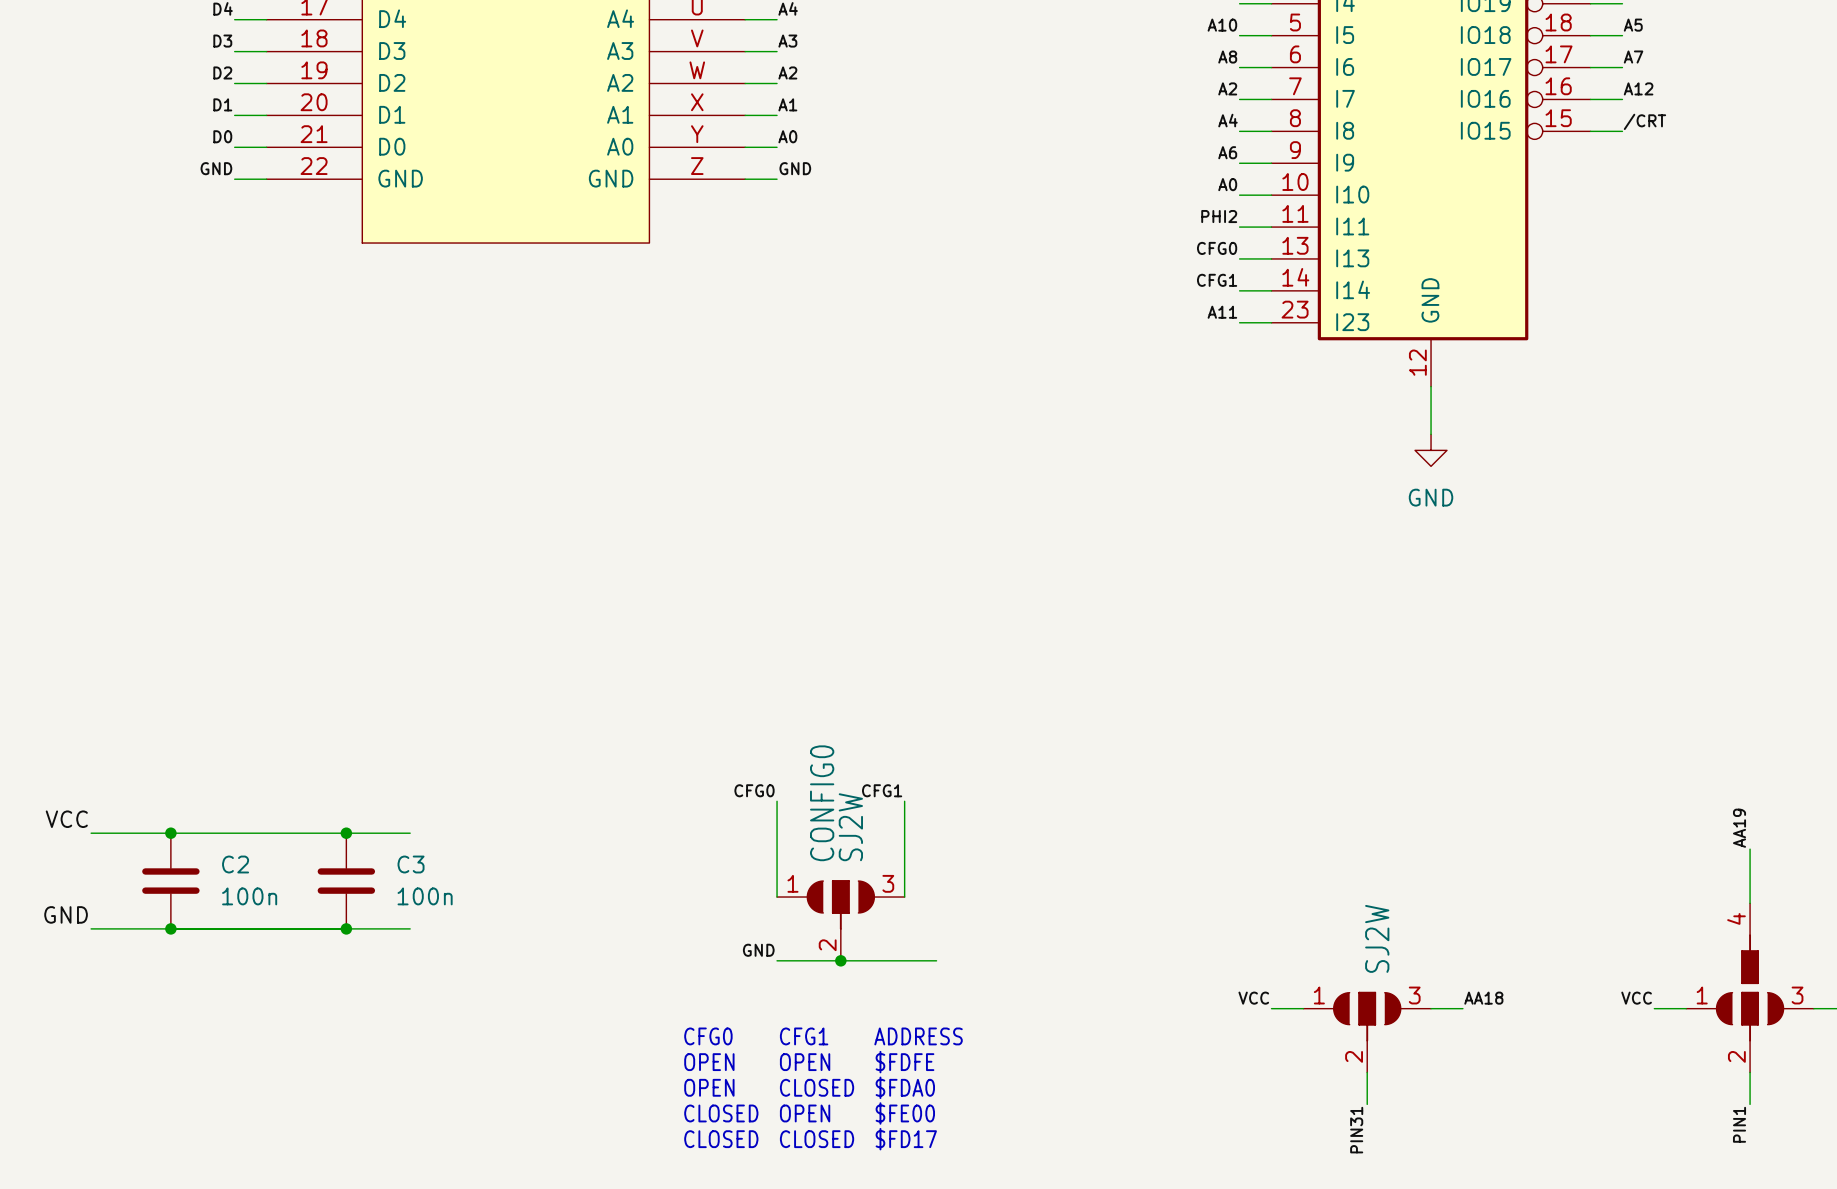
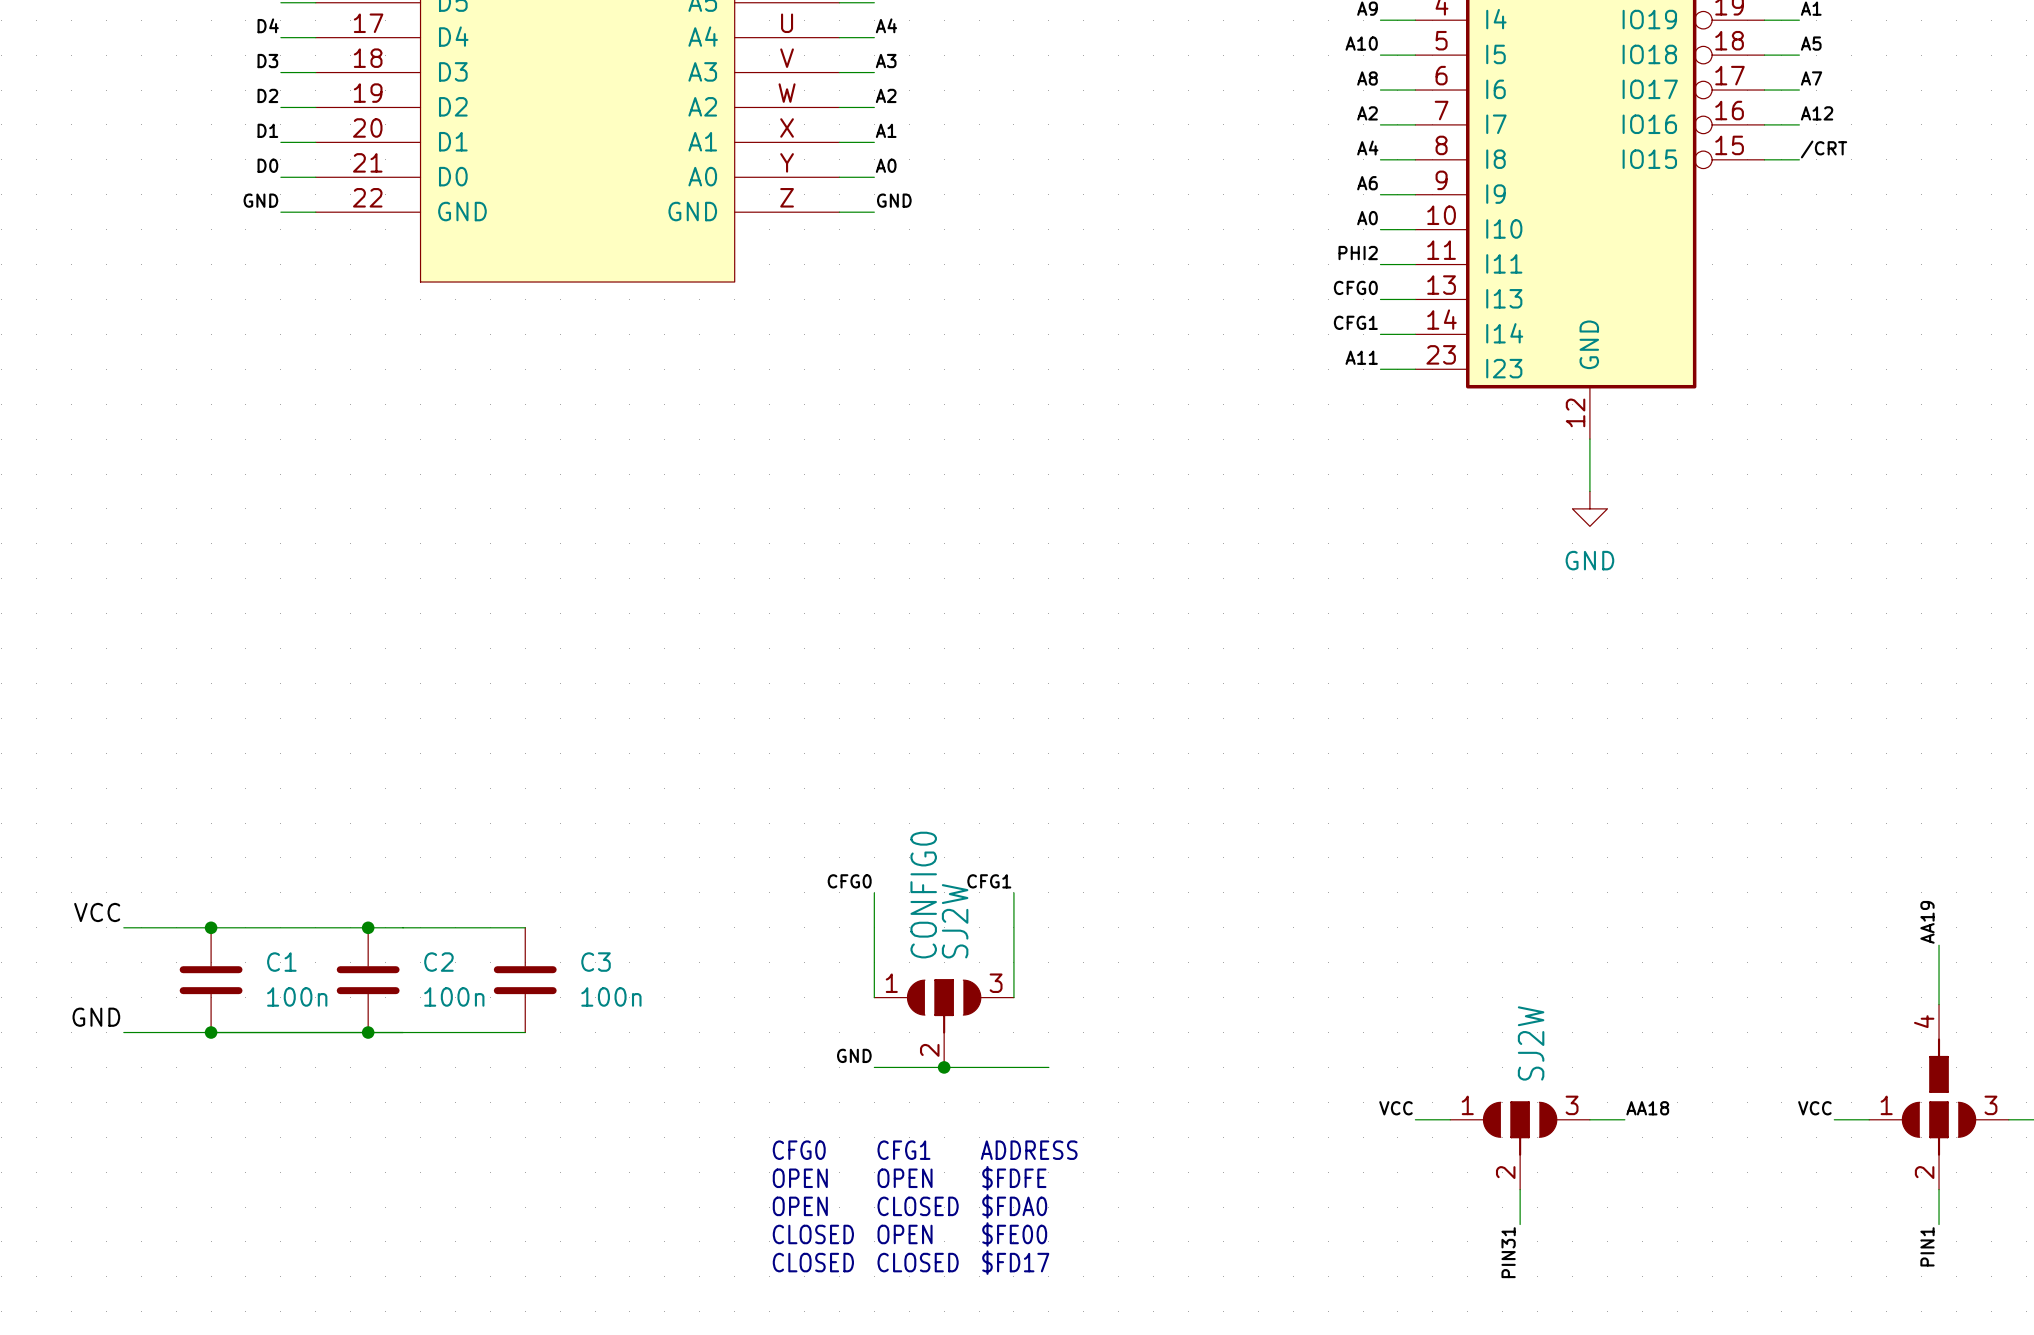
junction position: (346, 833) -> (368, 927)
wire: none -> (472, 927) (525, 927)
C2 name: C2 (235, 864) -> C1 (281, 962)
C2: none -> 100n (368, 980)
C3 position: (346, 881) -> (525, 980)
junction position: (346, 928) -> (368, 1032)
wire: none -> (472, 1032) (525, 1032)

